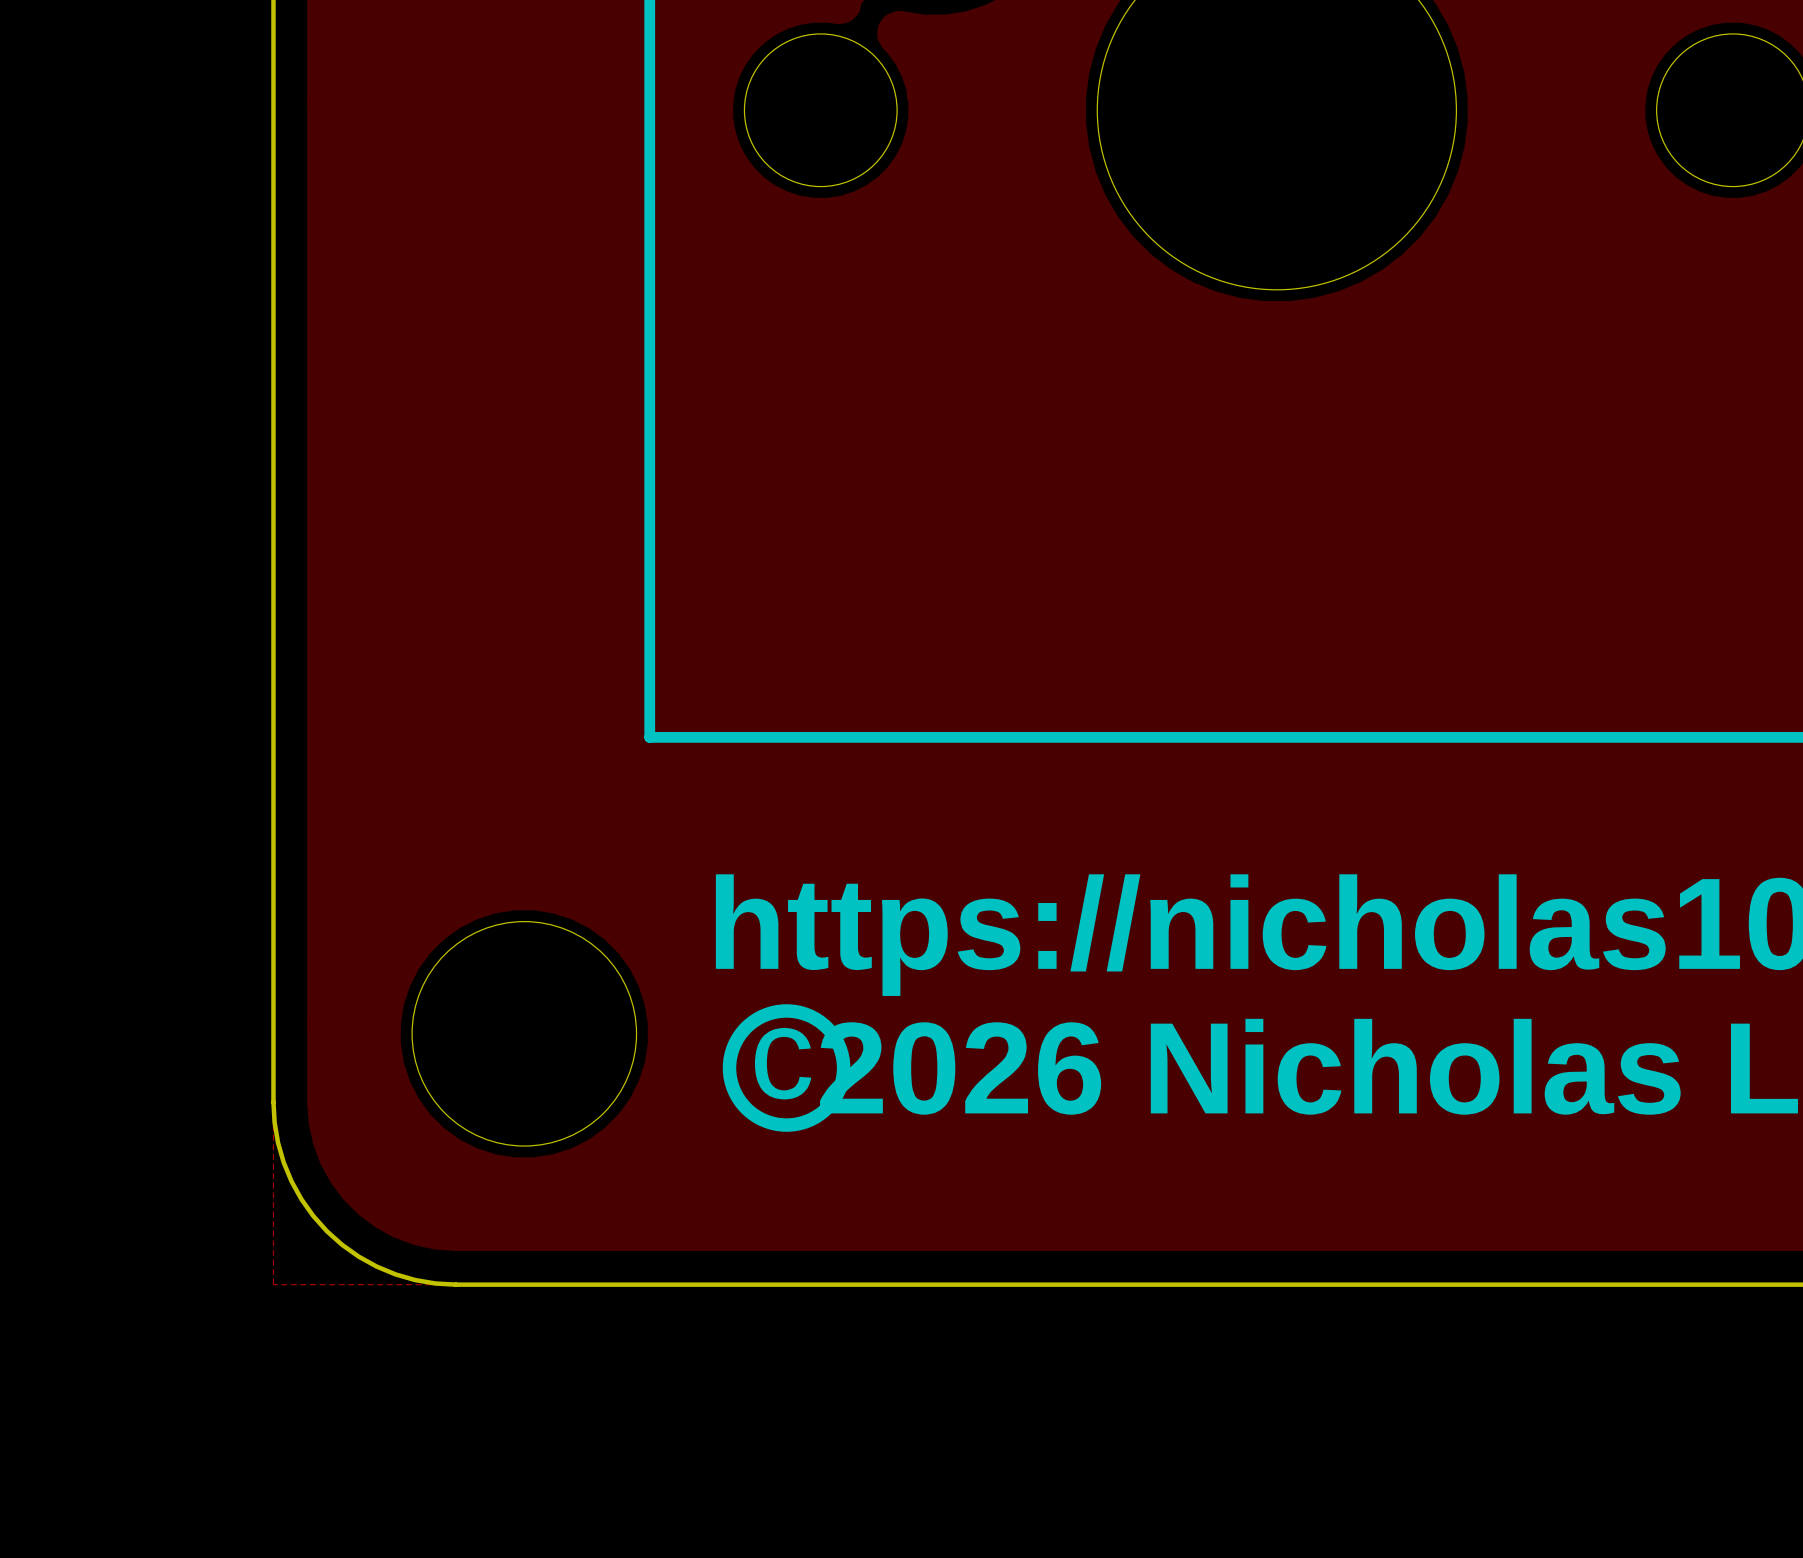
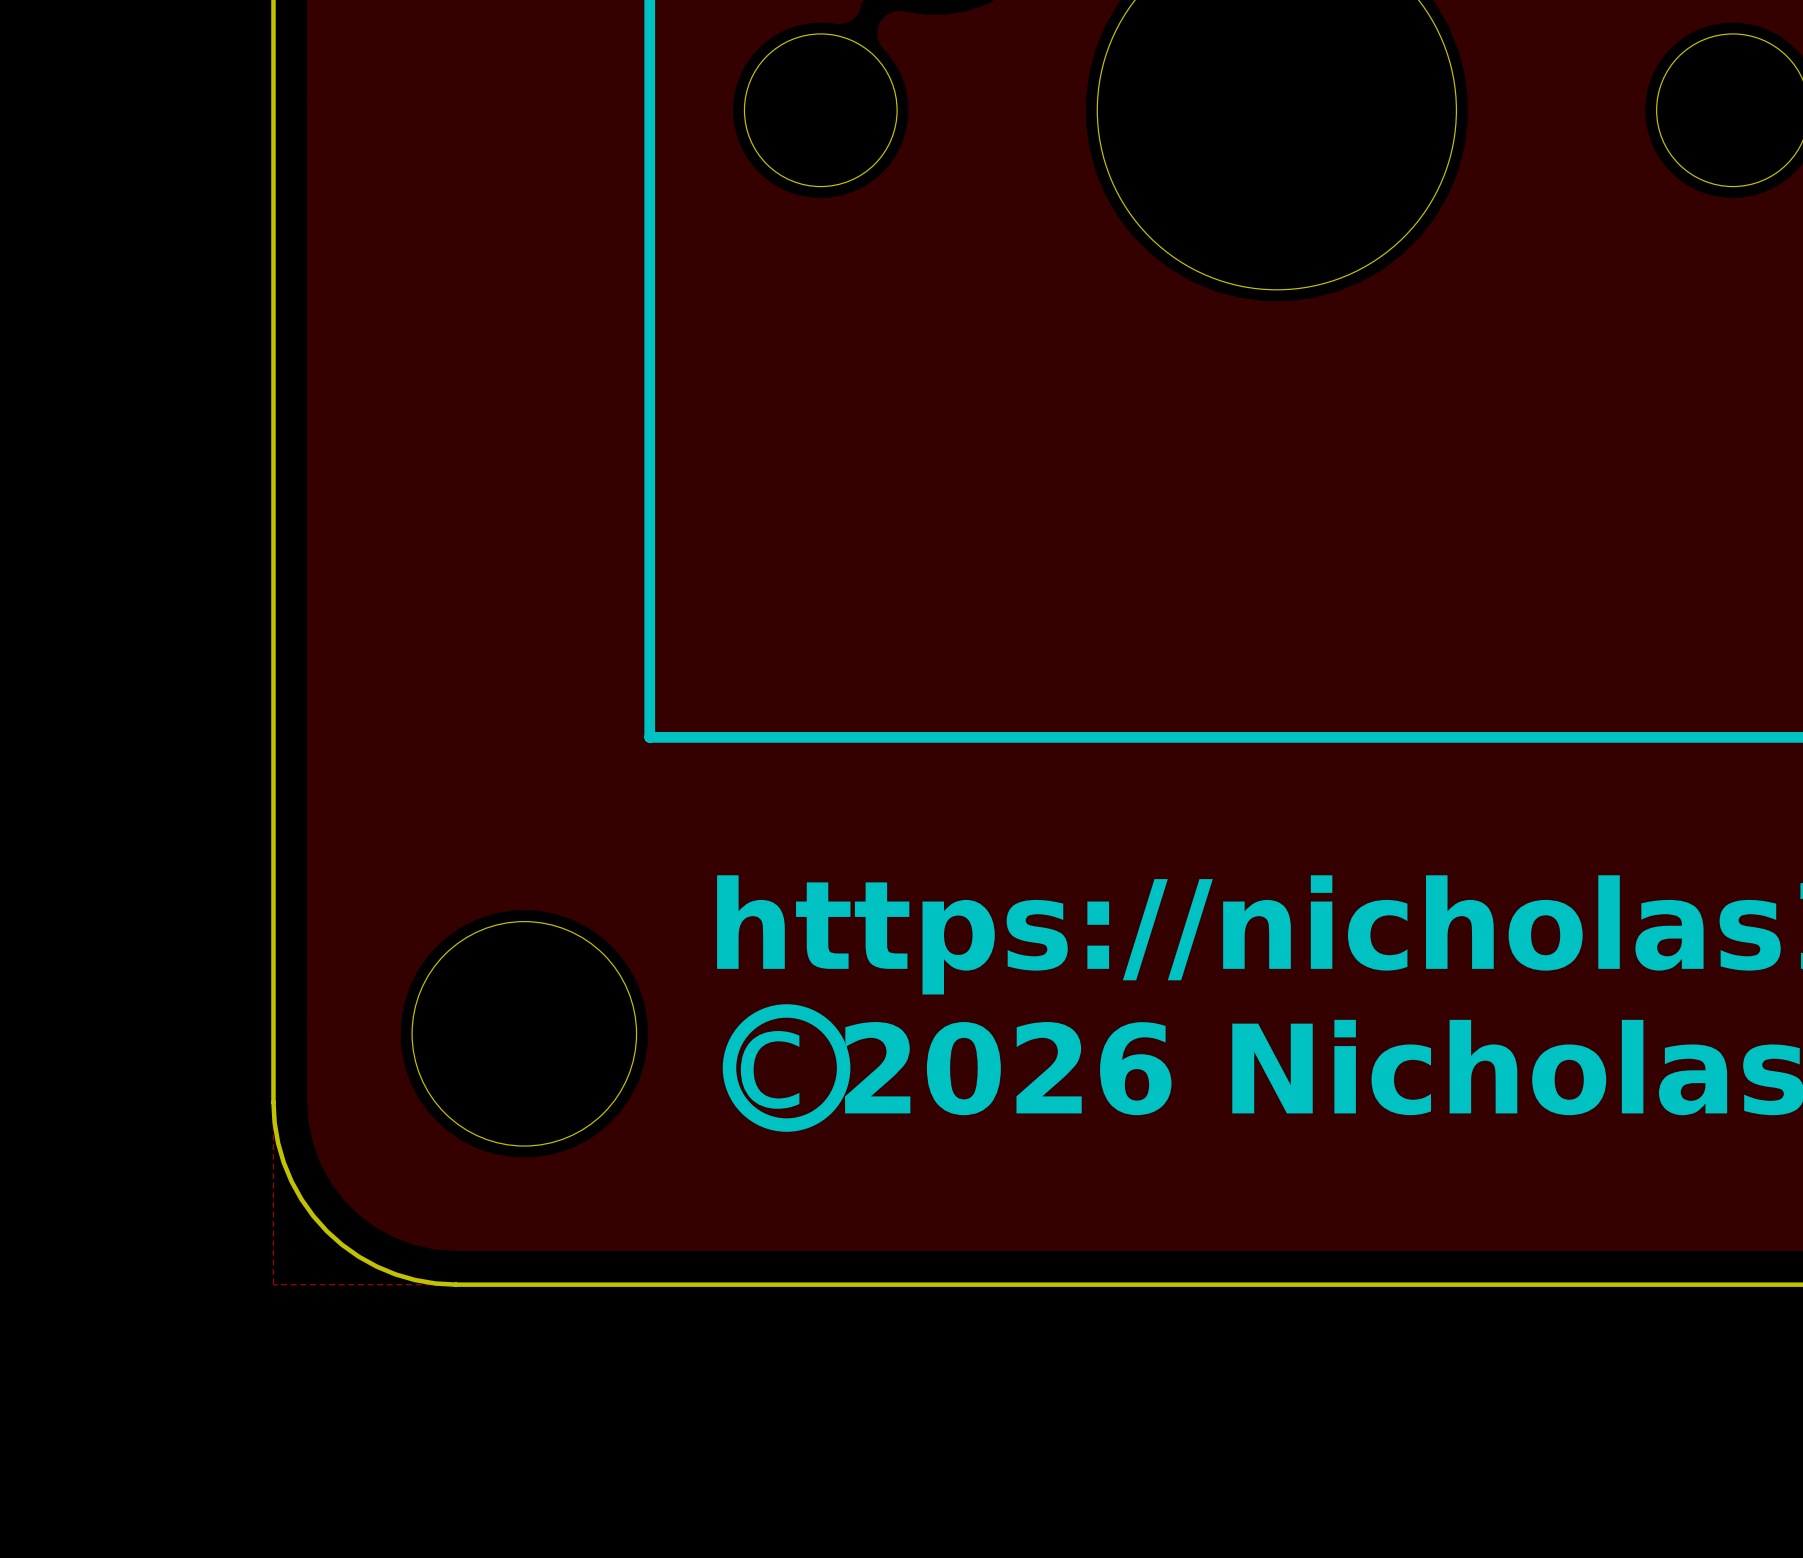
text position: c (783, 1063) -> c (770, 1069)

